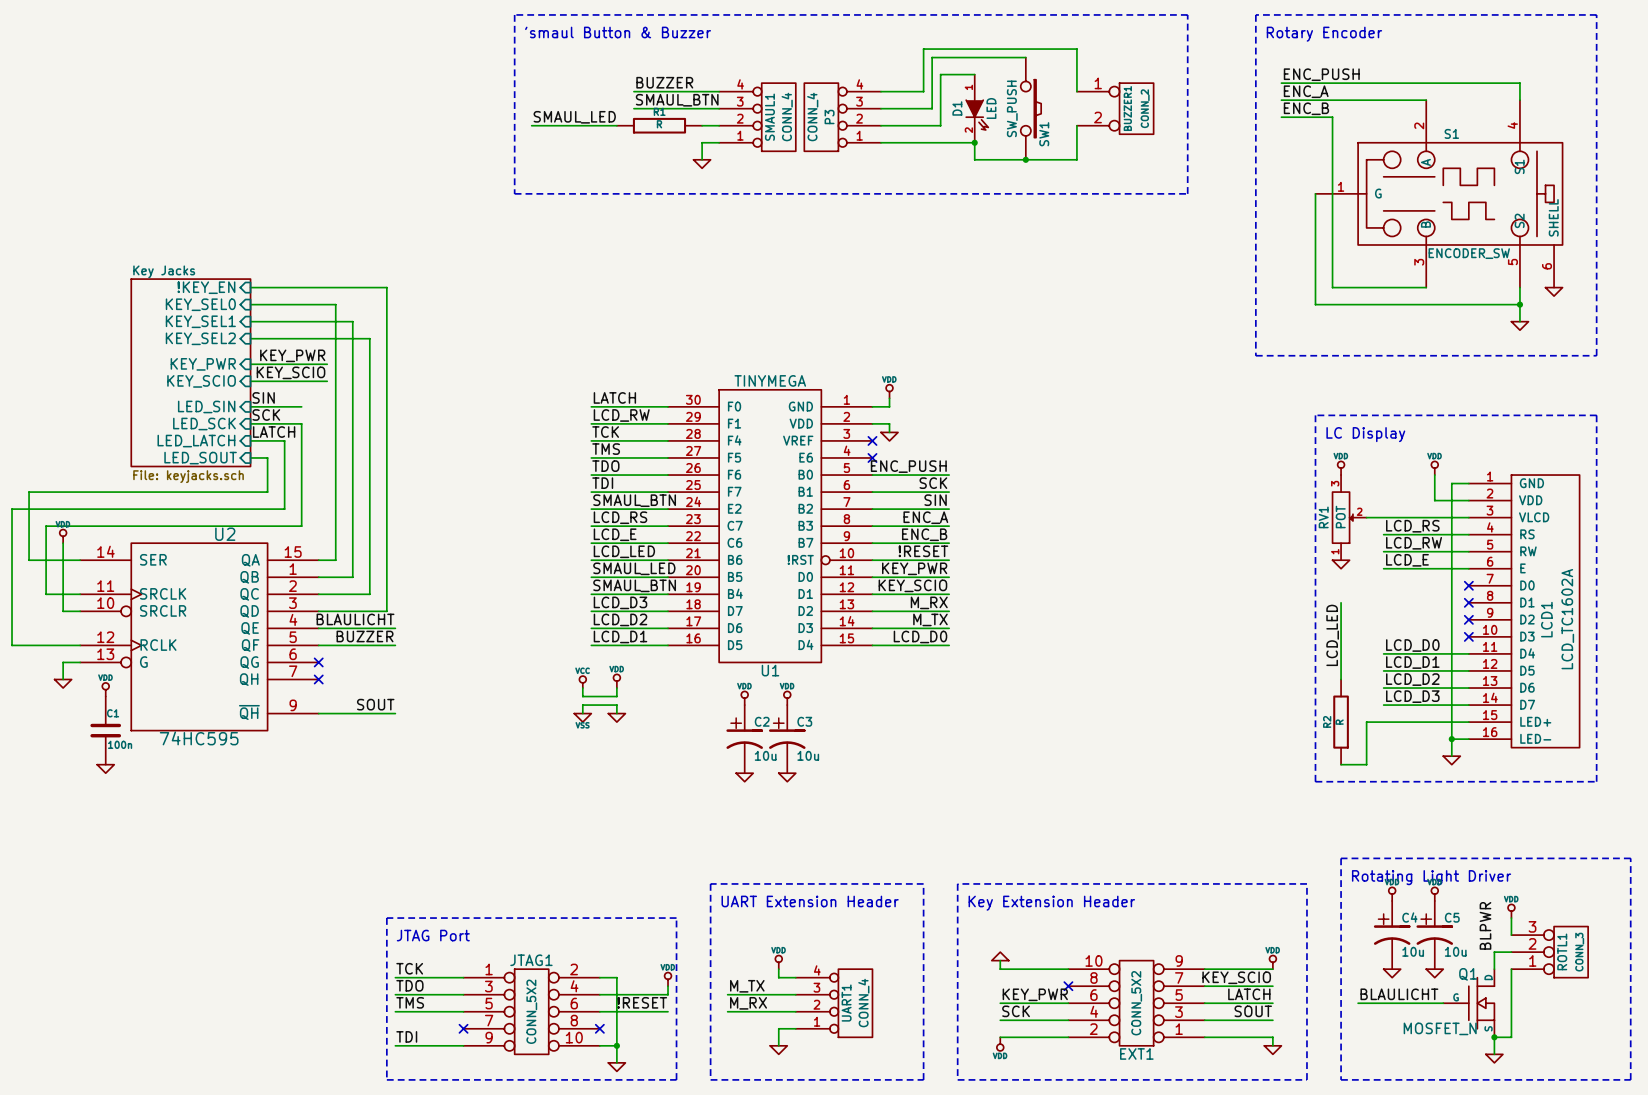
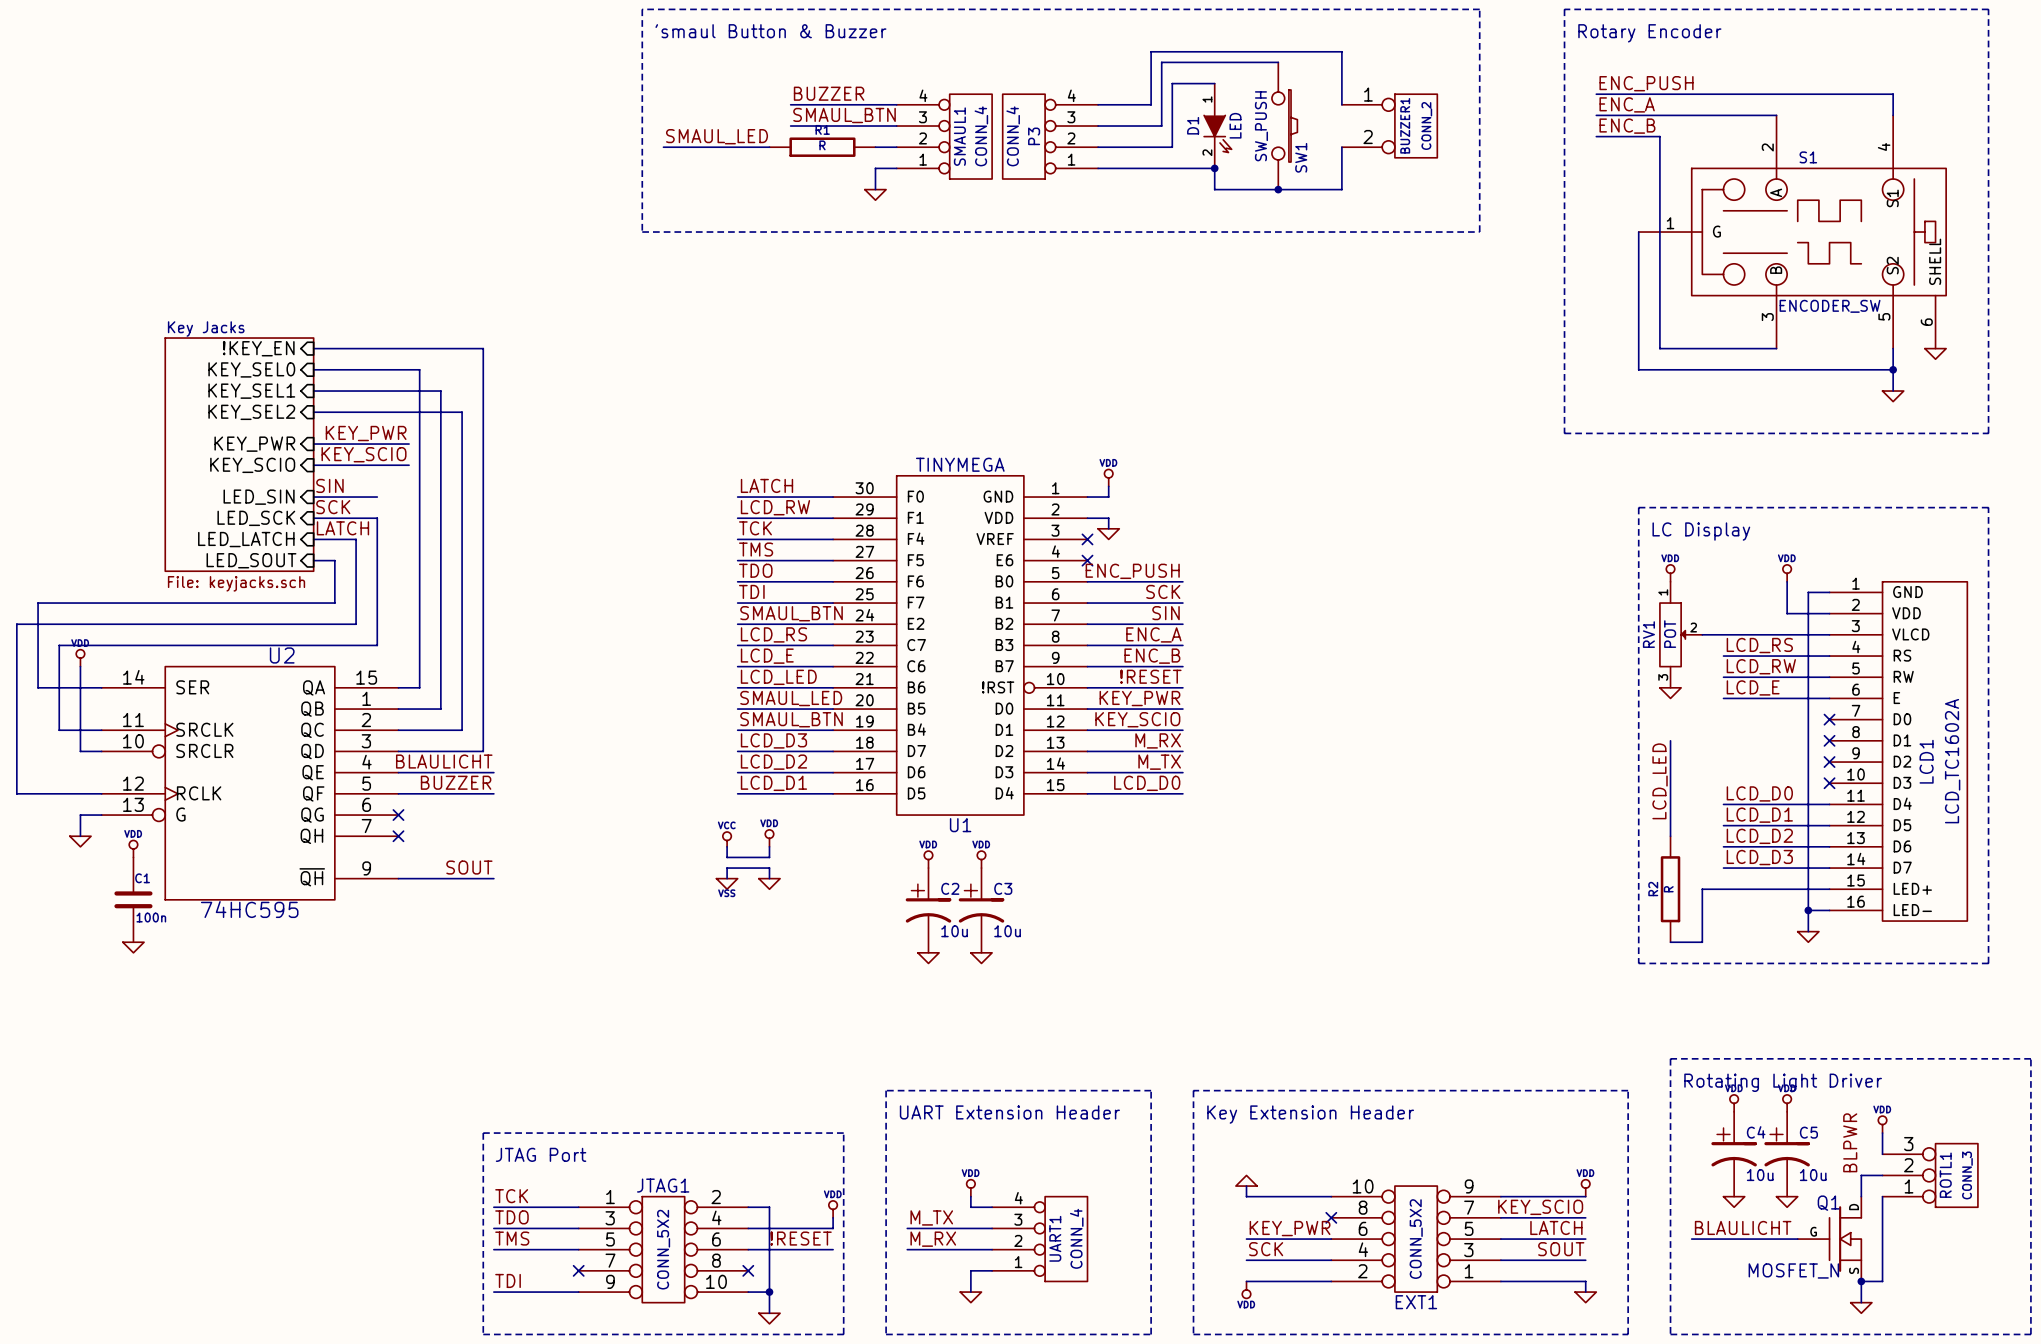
RV1 flip: as is (1342, 517) -> up-down (1672, 634)

